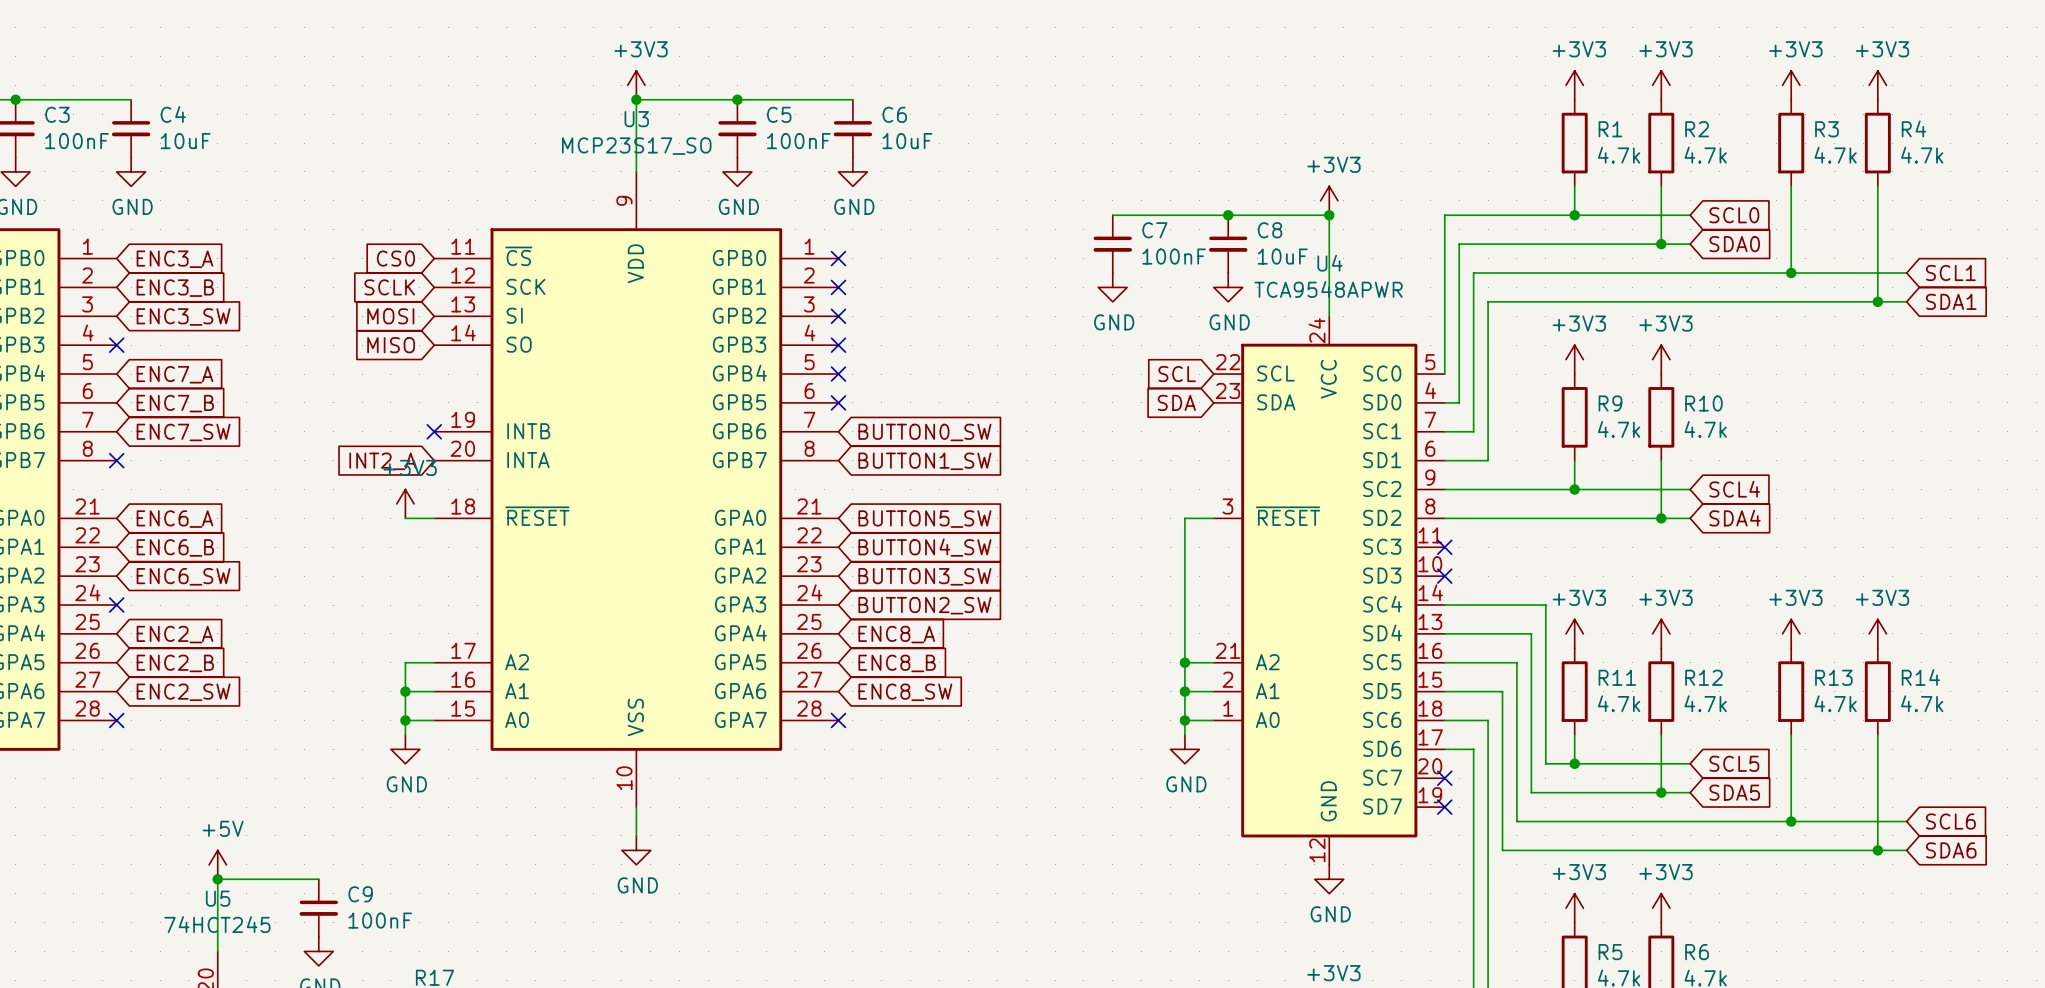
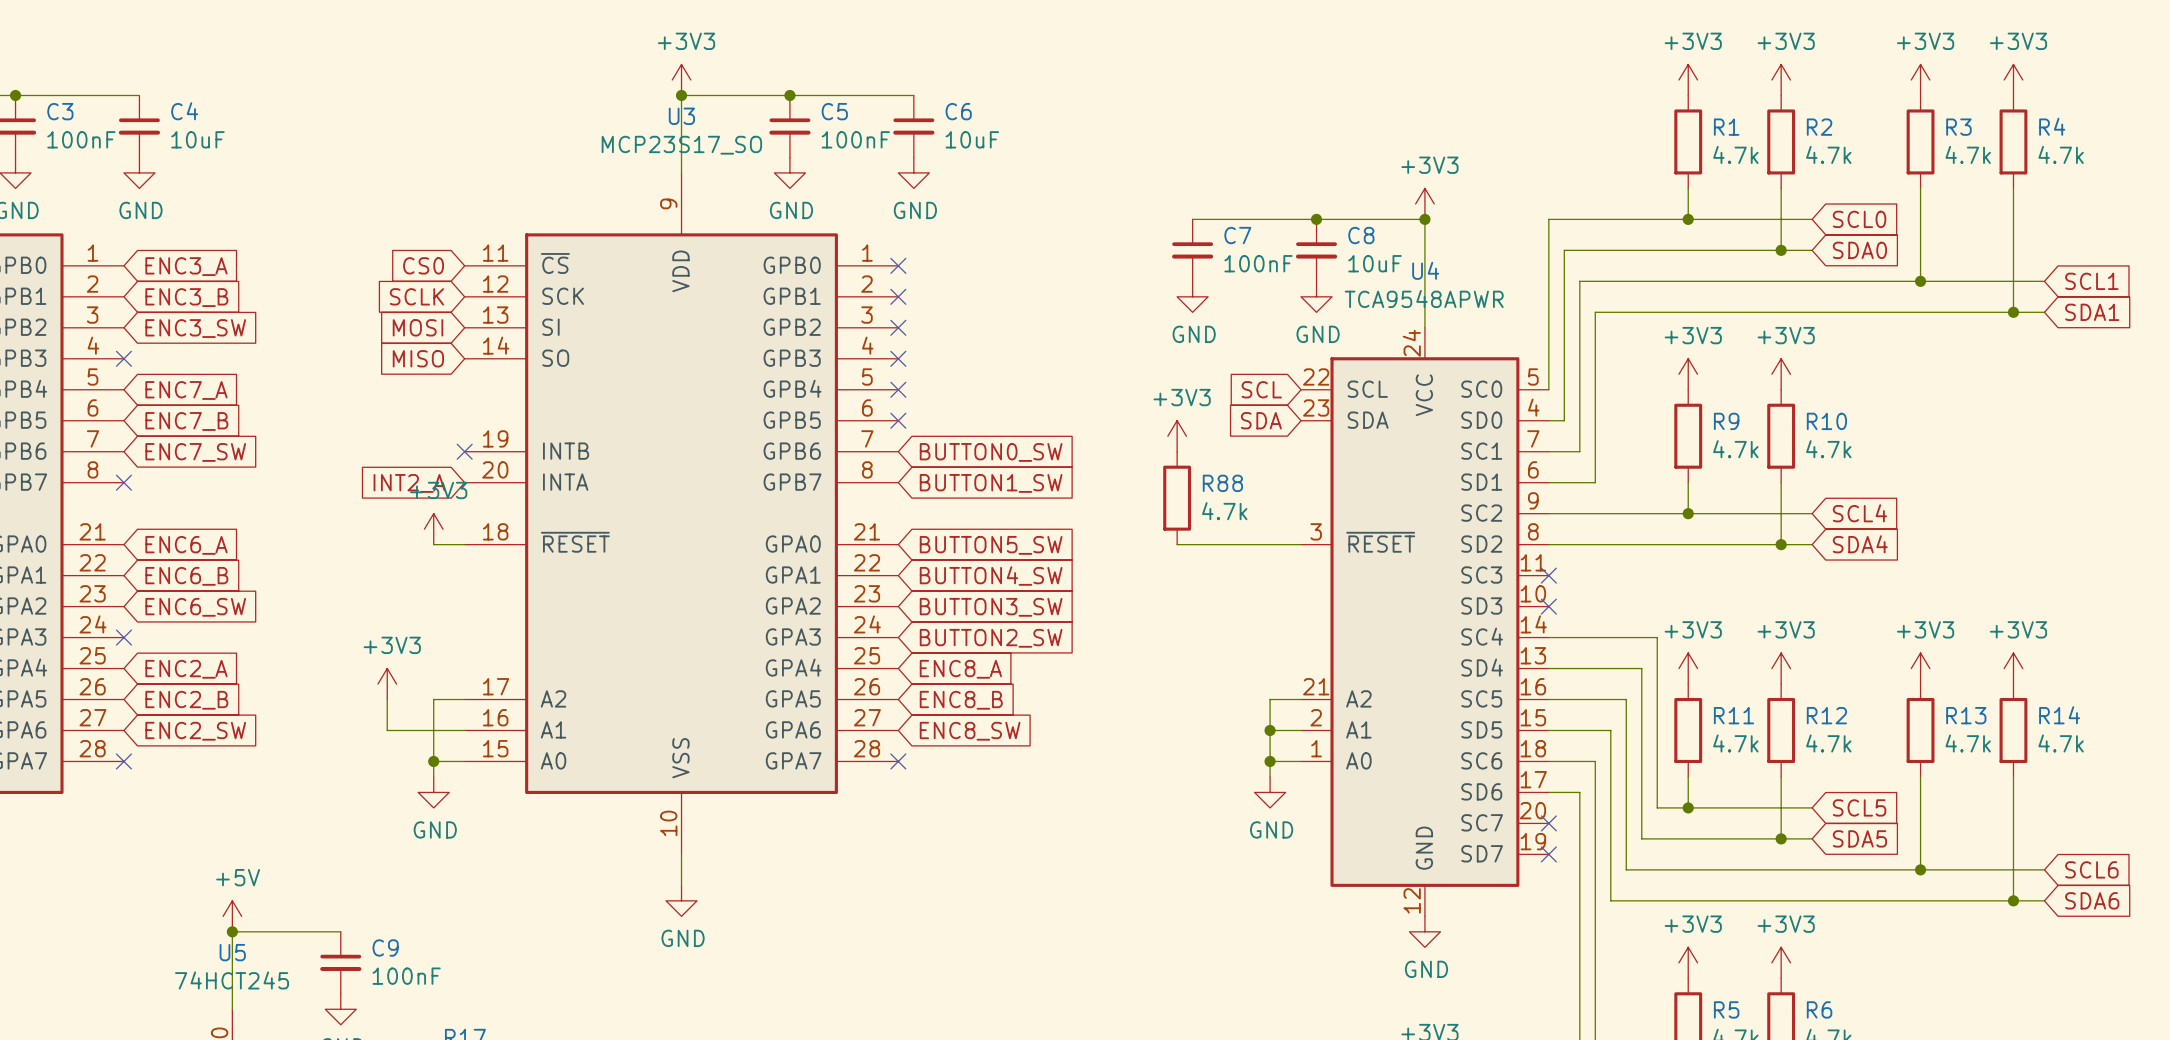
power symbol: none -> +3V3 (1177, 436)
R88: none -> 4.7k (1177, 498)
wire: (1184, 518) (1184, 662) -> (1270, 544) (1177, 544)
power symbol: none -> +3V3 (387, 684)
wire: none -> (387, 699) (387, 730) (433, 730)
junction: (1184, 662) -> none
junction: (405, 691) -> none

